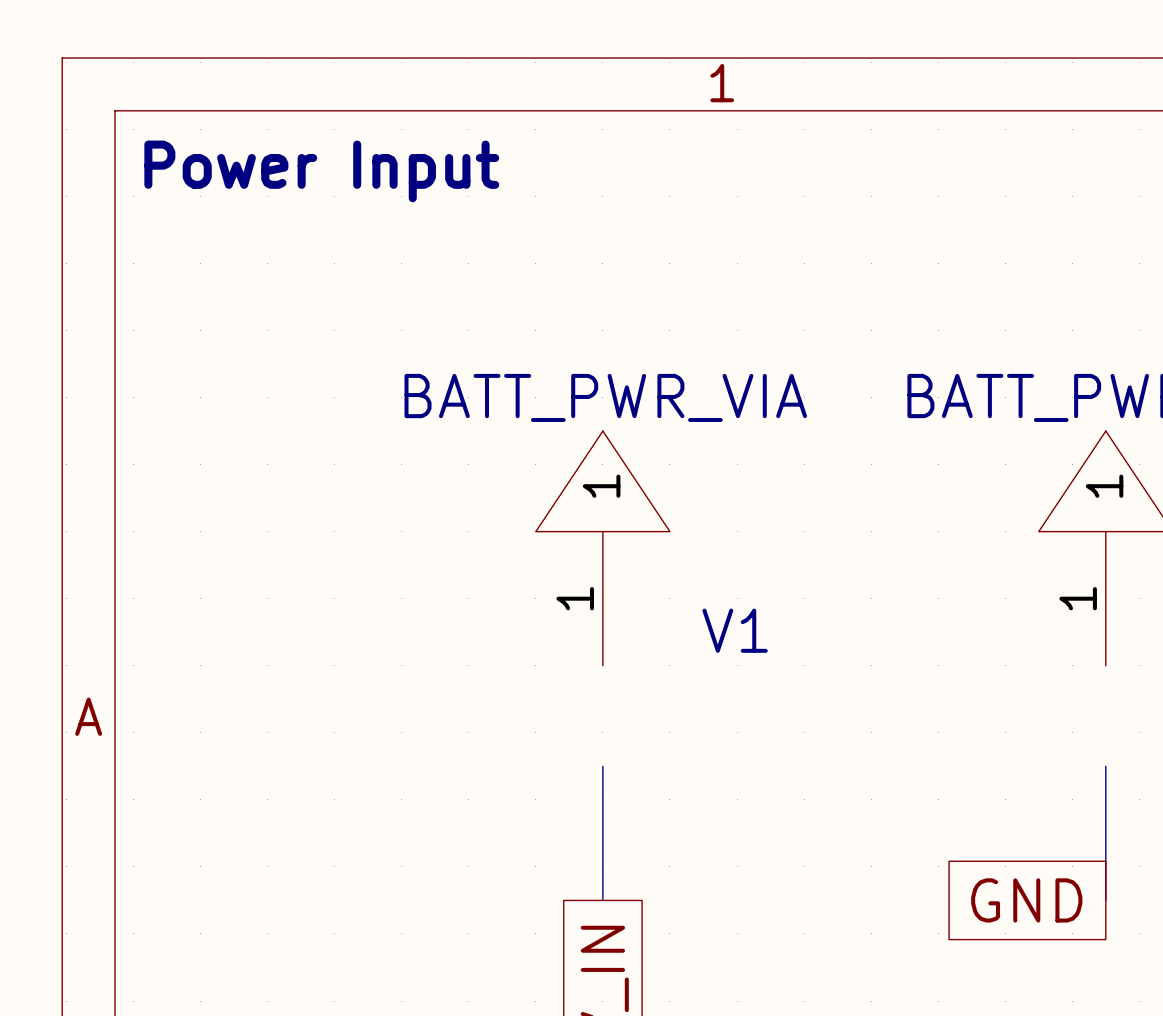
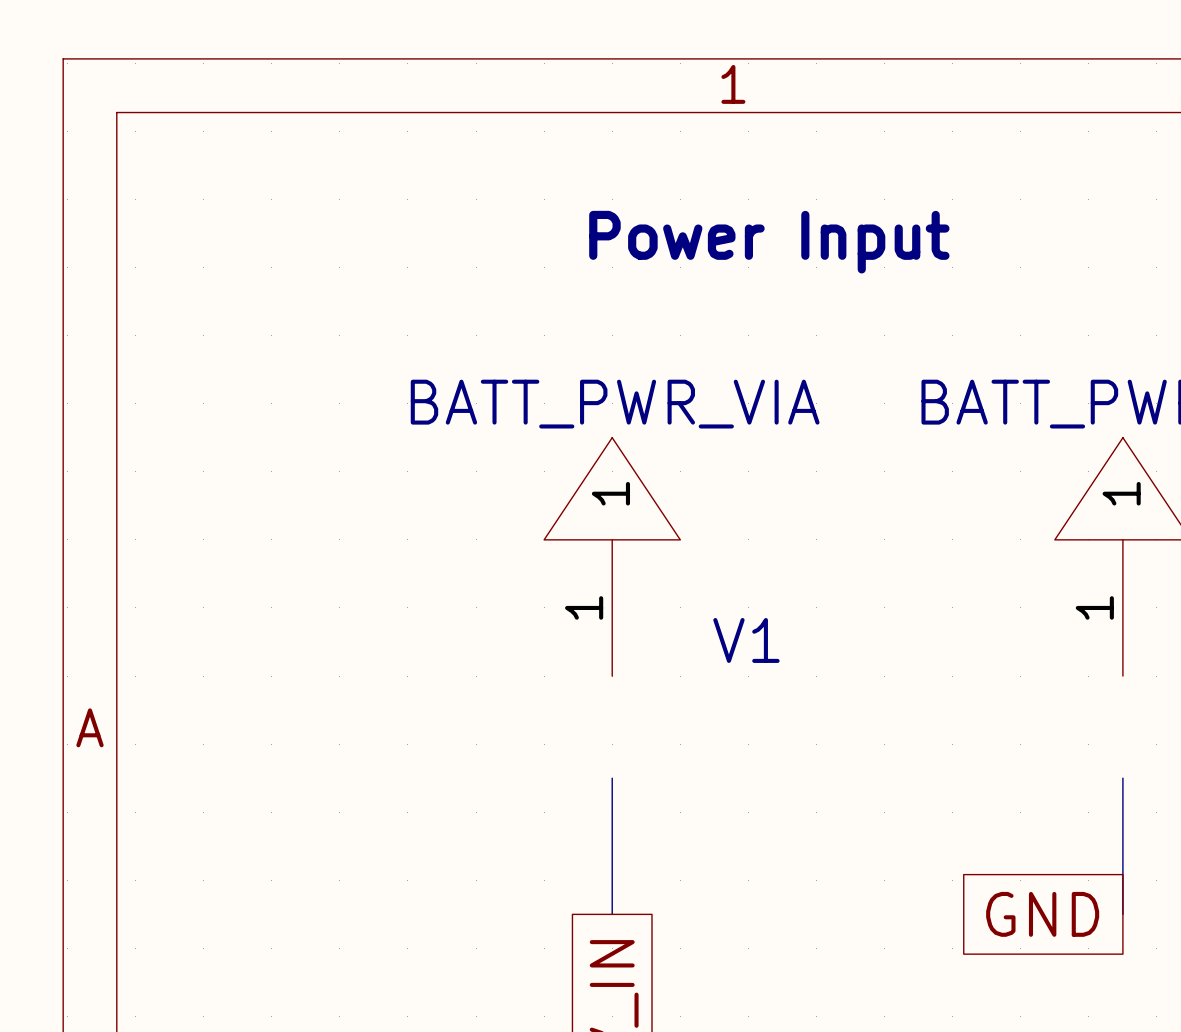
text position: Power Input (321, 171) -> Power Input (769, 242)

